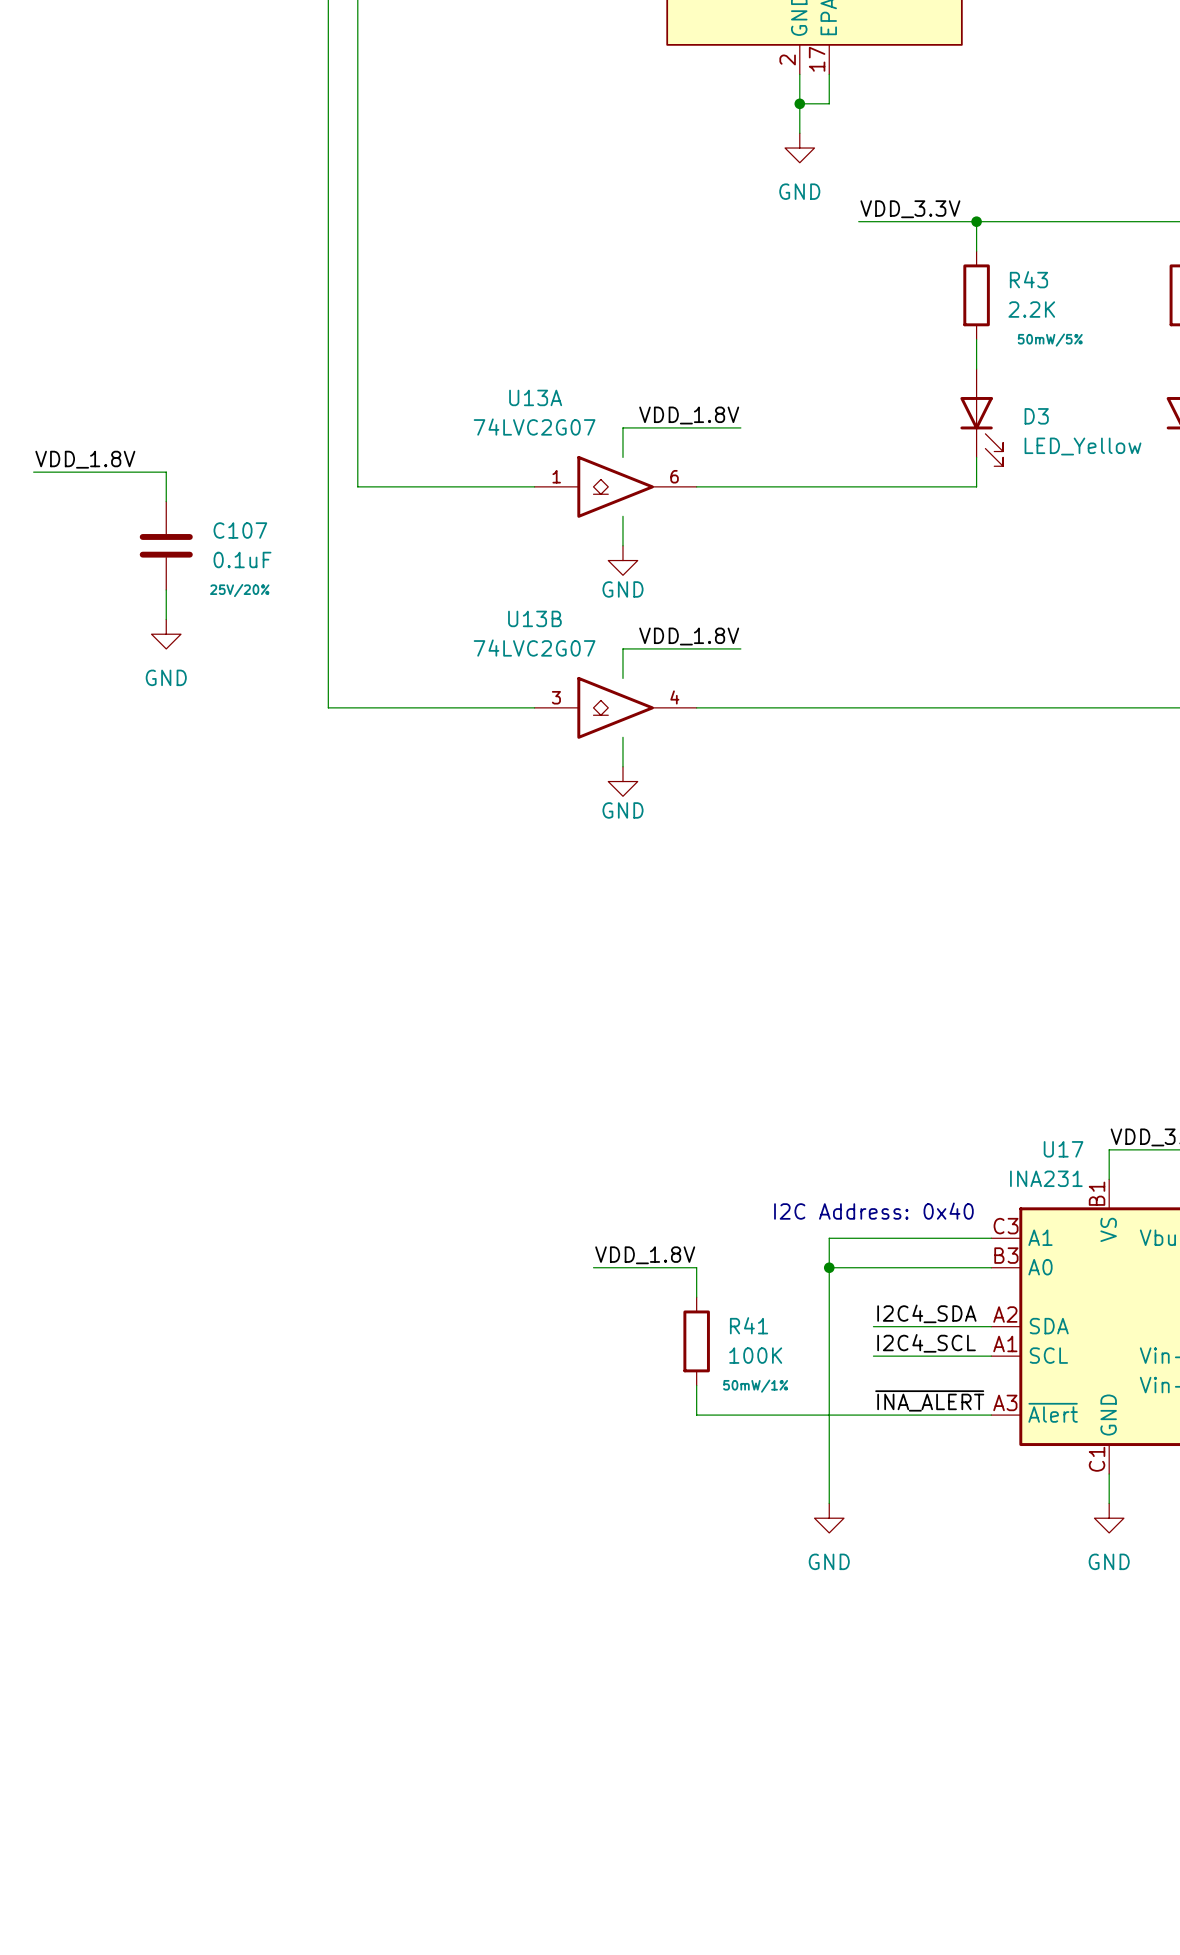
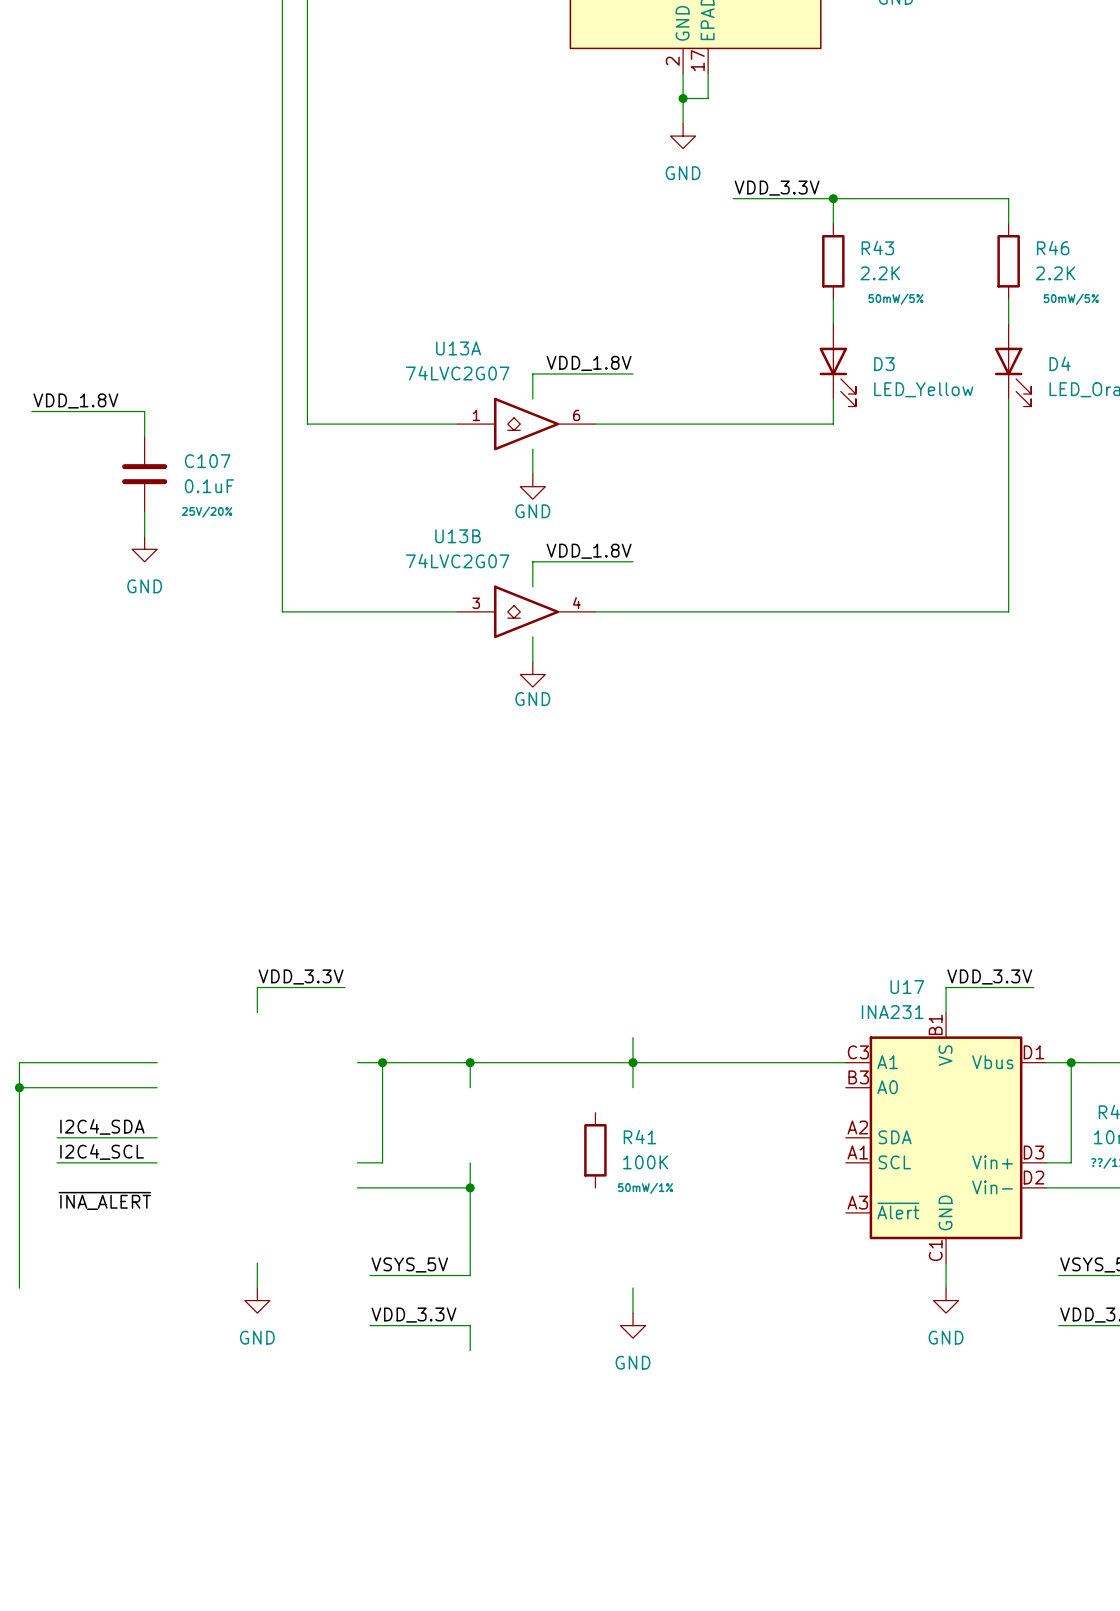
label: none -> VDD_3.3V (301, 976)
wire: none -> (344, 987) (257, 987) (257, 1012)
wire: none -> (632, 1037) (632, 1087)
text: I2C Address: 0x40 (873, 1211) -> none
wire: none -> (157, 1062) (19, 1062) (19, 1288)
wire: none -> (382, 1062) (382, 1162) (357, 1162)
junction: none -> (382, 1062)
wire: none -> (470, 1062) (470, 1087)
junction: none -> (470, 1062)
junction: none -> (632, 1062)
wire: (829, 1238) (829, 1503) -> (708, 1062) (357, 1062)
label: VDD_1.8V (645, 1255) -> none
wire: none -> (19, 1087) (157, 1087)
junction: none -> (19, 1087)
wire: (593, 1267) (696, 1267) (696, 1297) -> none
wire: (829, 1267) (991, 1267) -> none
junction: (829, 1267) -> none
label: none -> I2C4_SDA (102, 1126)
label: I2C4_SDA (926, 1313) -> none
wire: none -> (56, 1137) (157, 1137)
wire: (873, 1326) (991, 1326) -> none
label: none -> I2C4_SCL (102, 1151)
label: I2C4_SCL (926, 1343) -> none
wire: none -> (56, 1162) (157, 1162)
wire: none -> (470, 1162) (470, 1275) (370, 1275)
wire: (873, 1356) (991, 1356) -> none
wire: none -> (357, 1187) (470, 1187)
junction: none -> (470, 1187)
wire: (696, 1385) (696, 1415) (991, 1415) -> none
label: none -> ~{INA_ALERT} (104, 1200)
label: ~{INA_ALERT} (929, 1400) -> none
wire: none -> (257, 1263) (257, 1288)
label: none -> VSYS_5V (409, 1264)
wire: none -> (632, 1288) (632, 1313)
power symbol: none -> GND (257, 1300)
power symbol position: GND (829, 1518) -> GND (632, 1325)
label: none -> VDD_3.3V (413, 1315)
wire: none -> (370, 1325) (470, 1325) (470, 1350)

